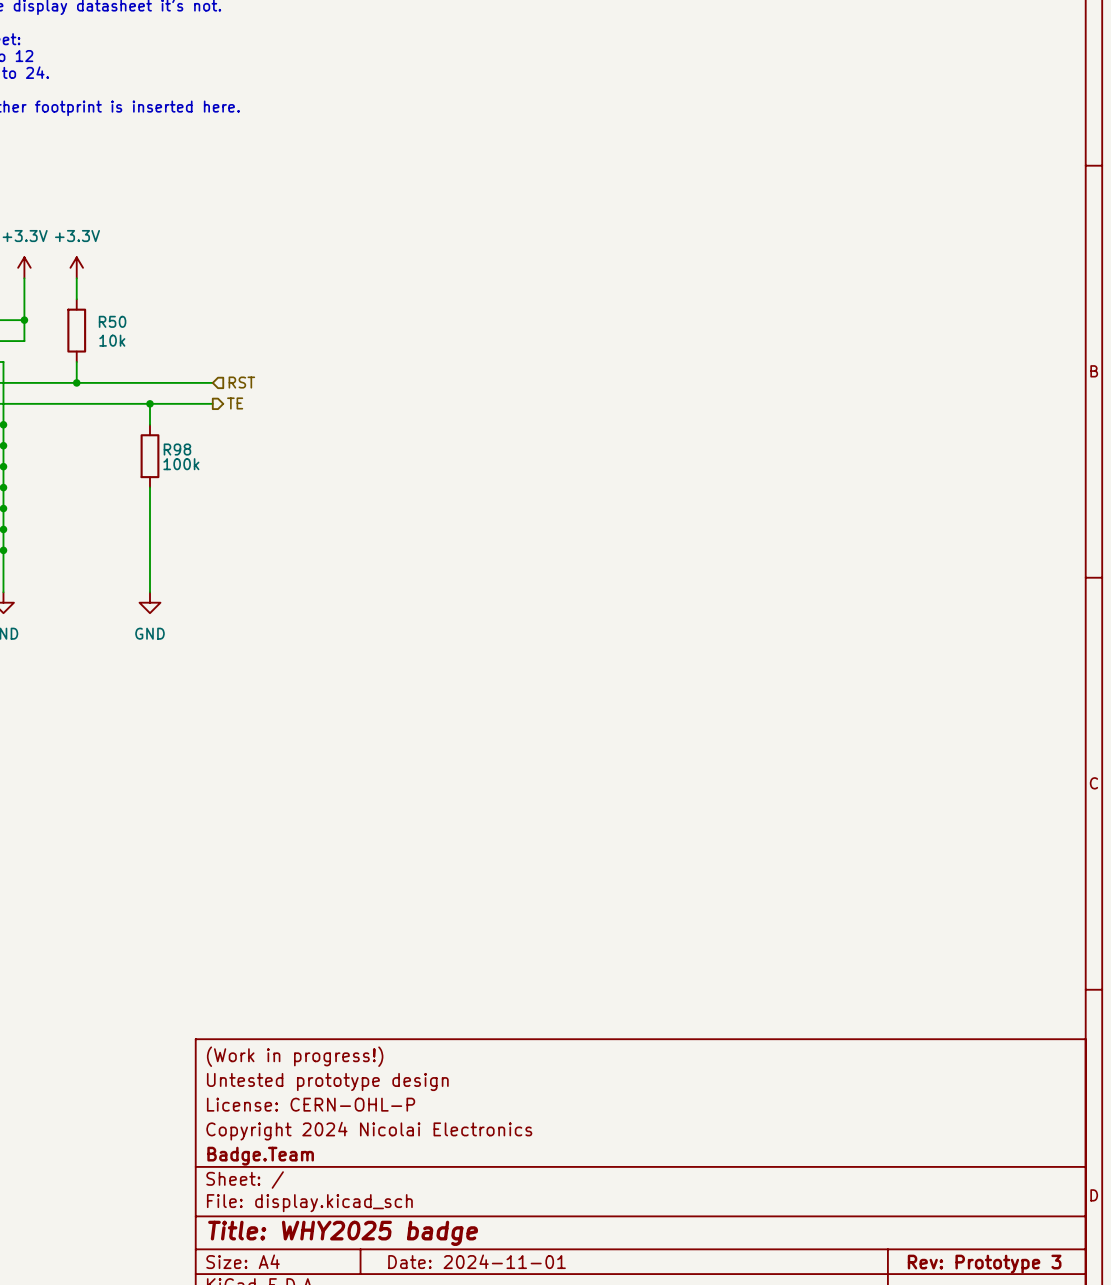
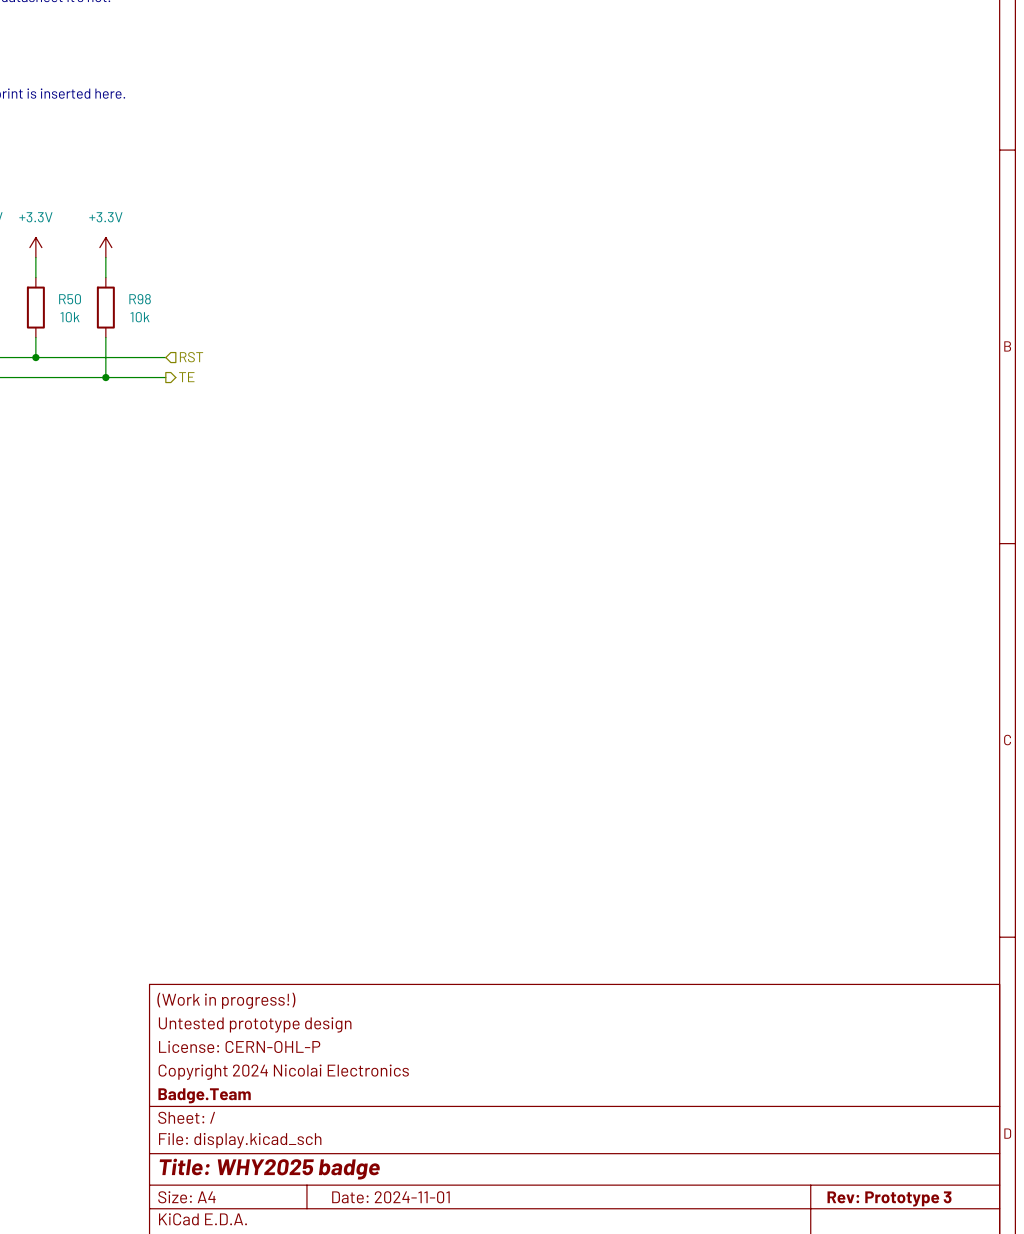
power symbol: none -> +3.3V (105, 247)
wire: none -> (105, 257) (105, 277)
wire: (149, 403) (149, 424) -> (105, 377) (105, 337)
R98 name position: R98 (177, 449) -> R98 (140, 299)
R98 position: (149, 456) -> (105, 307)
R98 value: 100k (181, 464) -> 10k (140, 317)
wire: (149, 487) (149, 592) -> none
power symbol: GND (149, 602) -> none

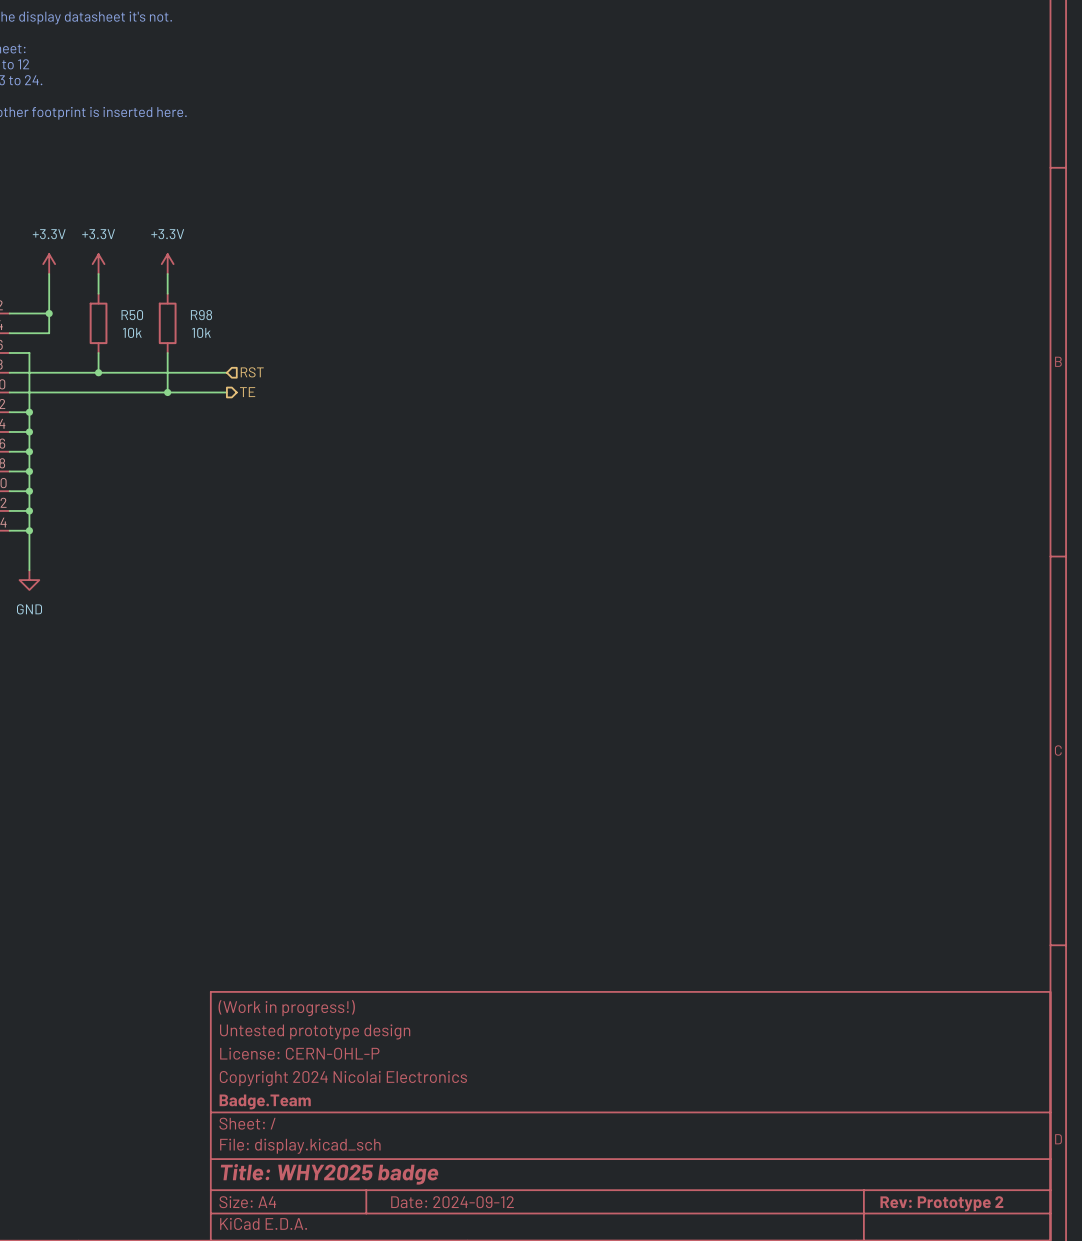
title block: Date: 2024-11-01 (390, 1197) -> Date: 2024-09-12 (452, 1202)
title block: Rev: Prototype 3 (889, 1198) -> Rev: Prototype 2 (941, 1203)

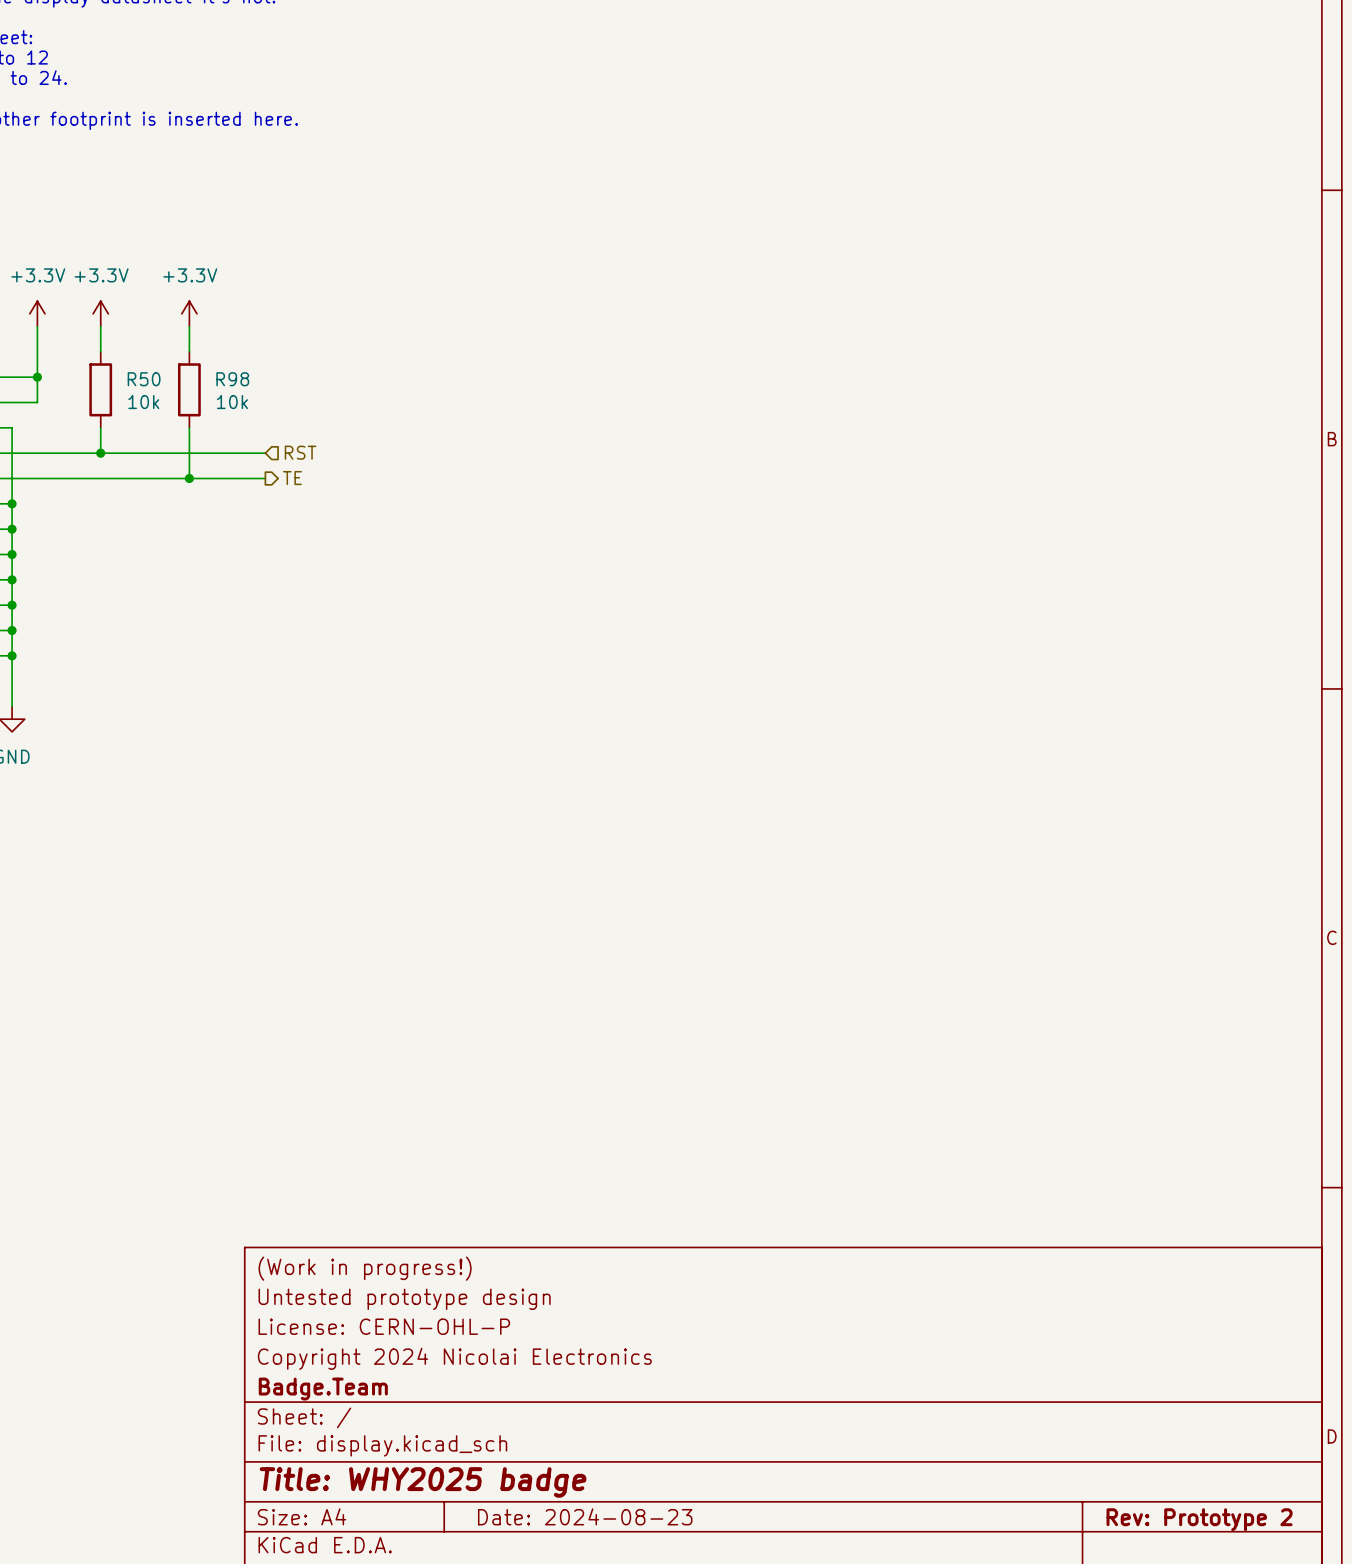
title block: Date: 2024-09-12 (452, 1202) -> Date: 2024-08-23 (585, 1516)

